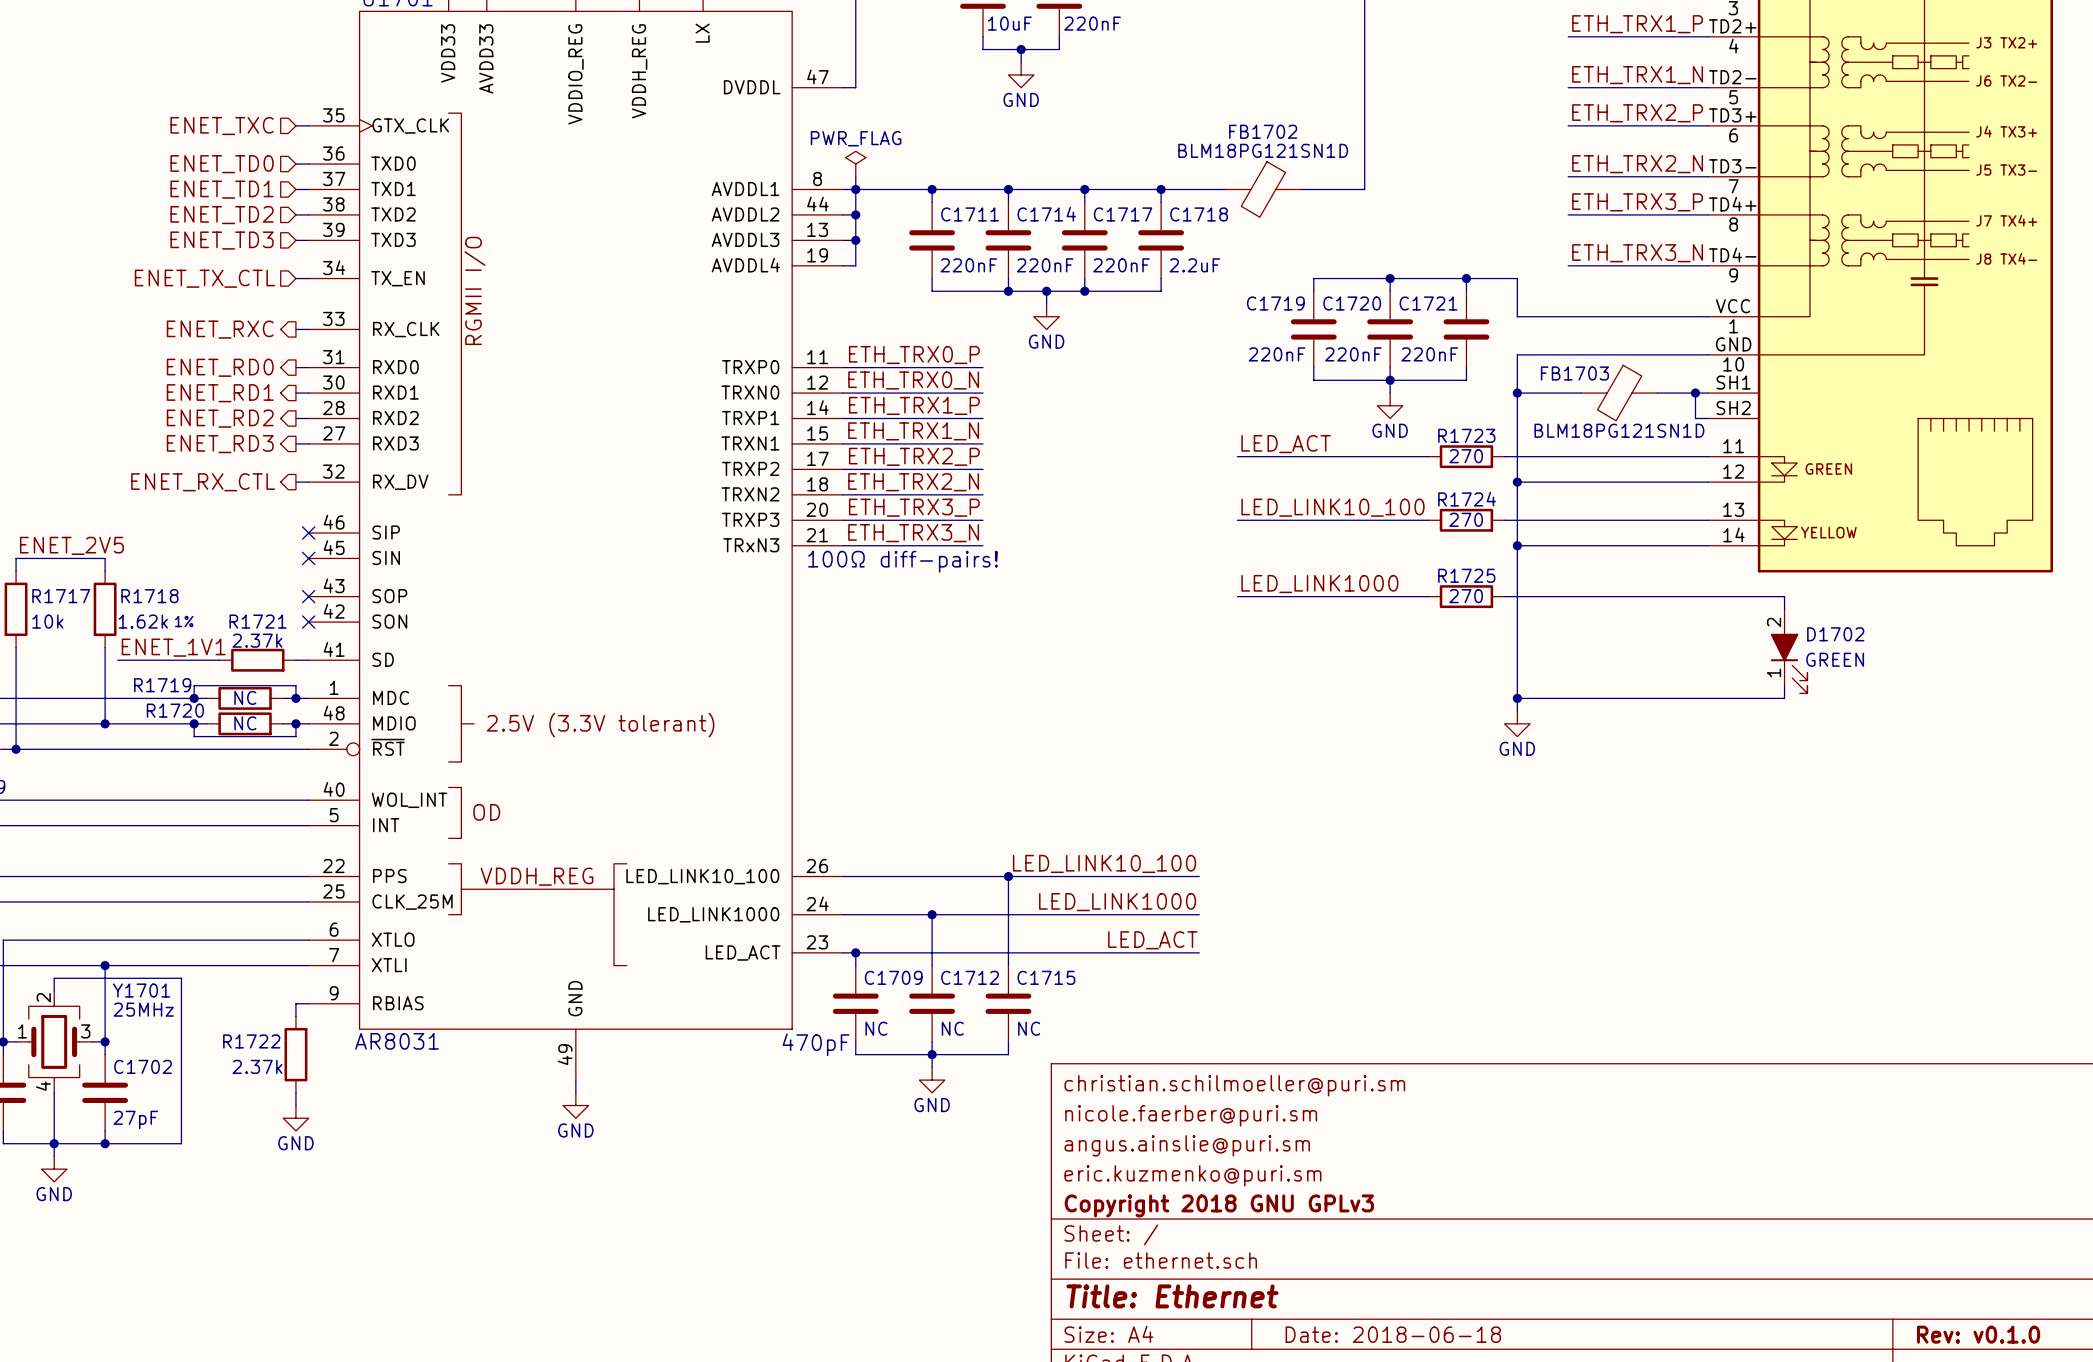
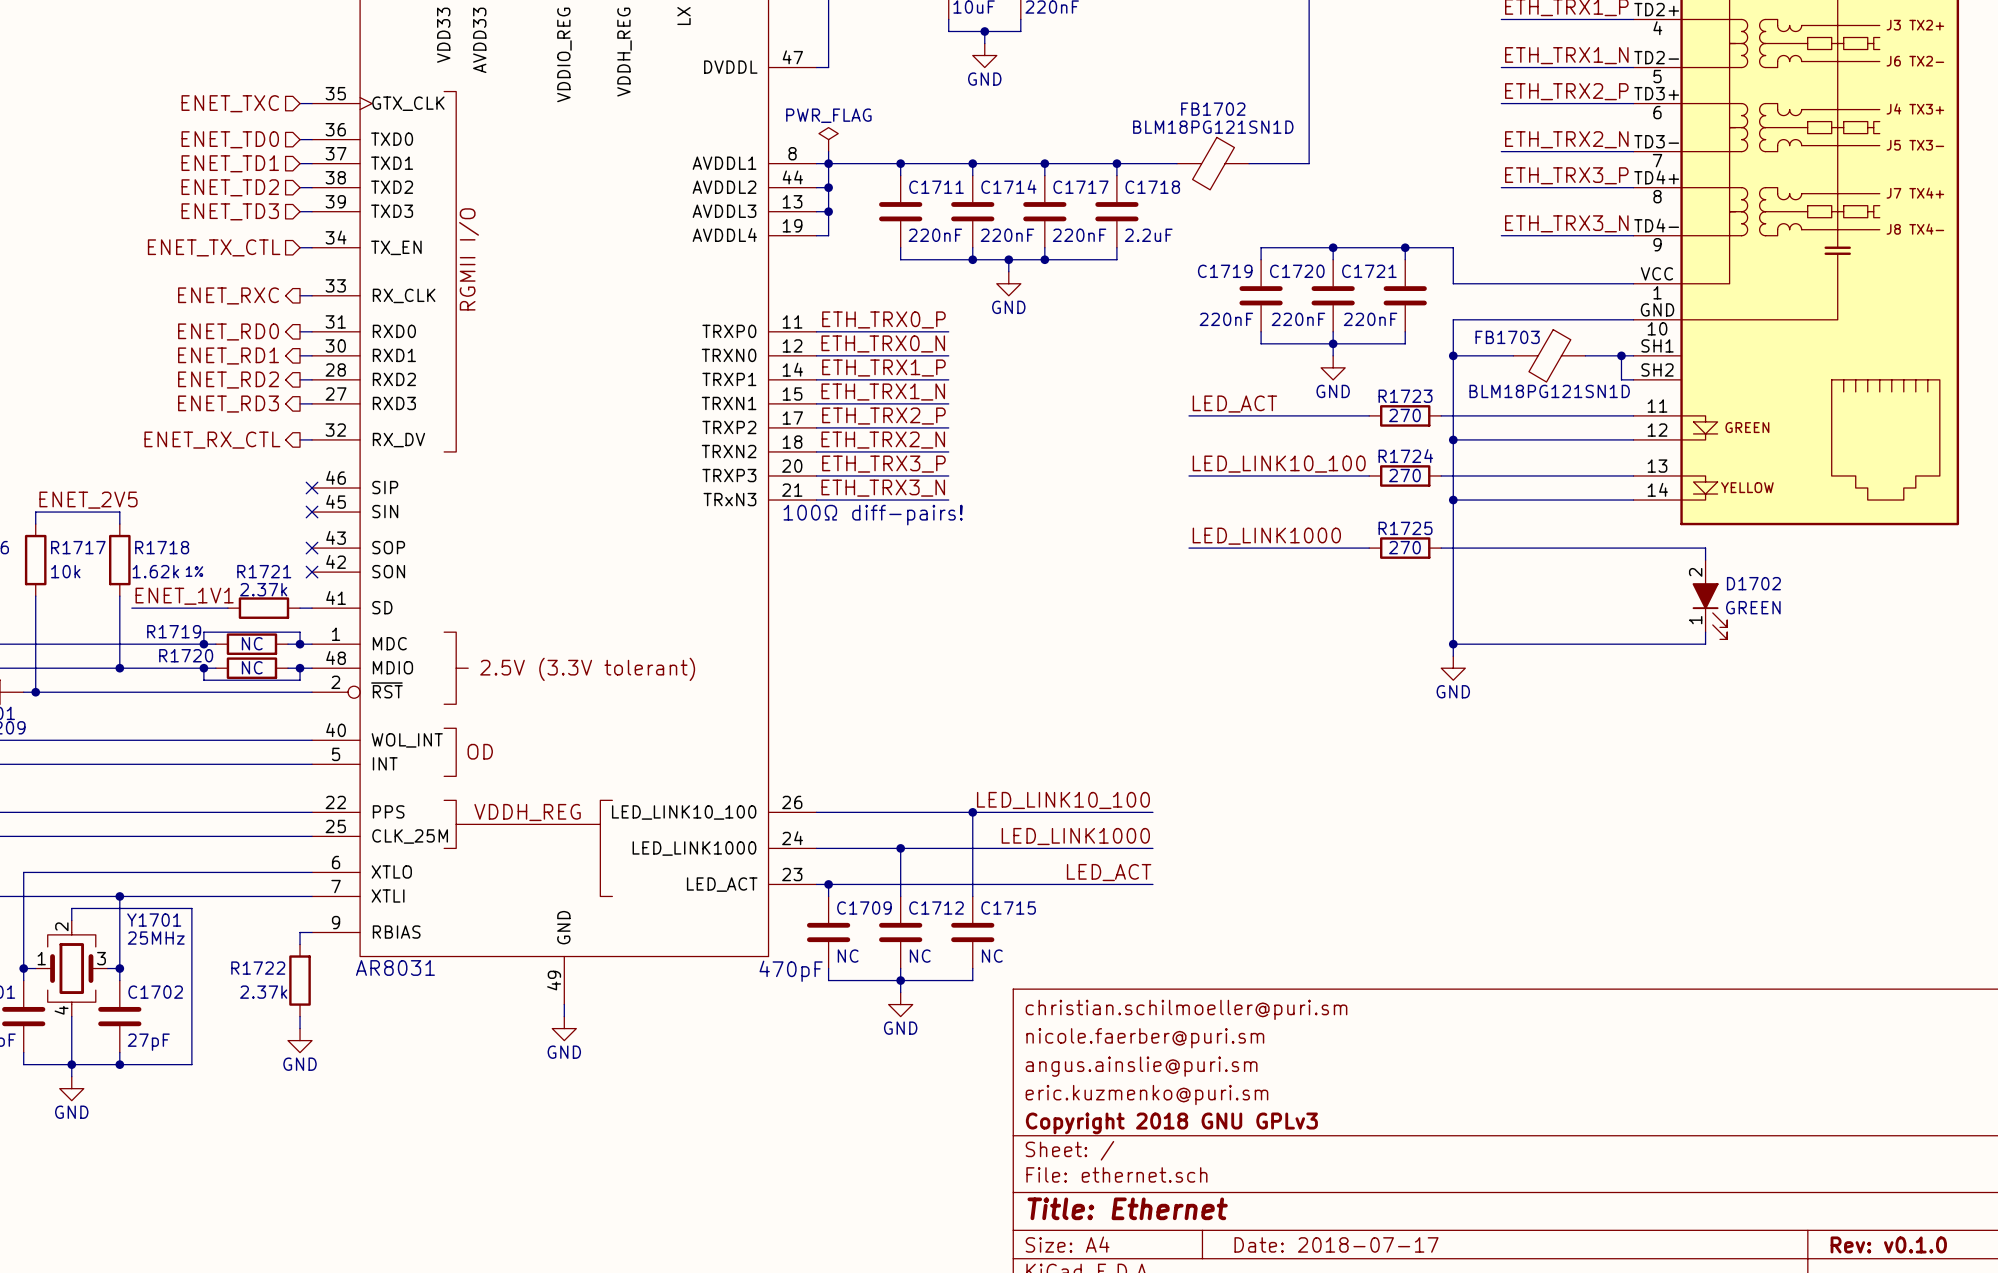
title block: Date: 2018-06-18 (1393, 1334) -> Date: 2018-07-17 (1336, 1244)

